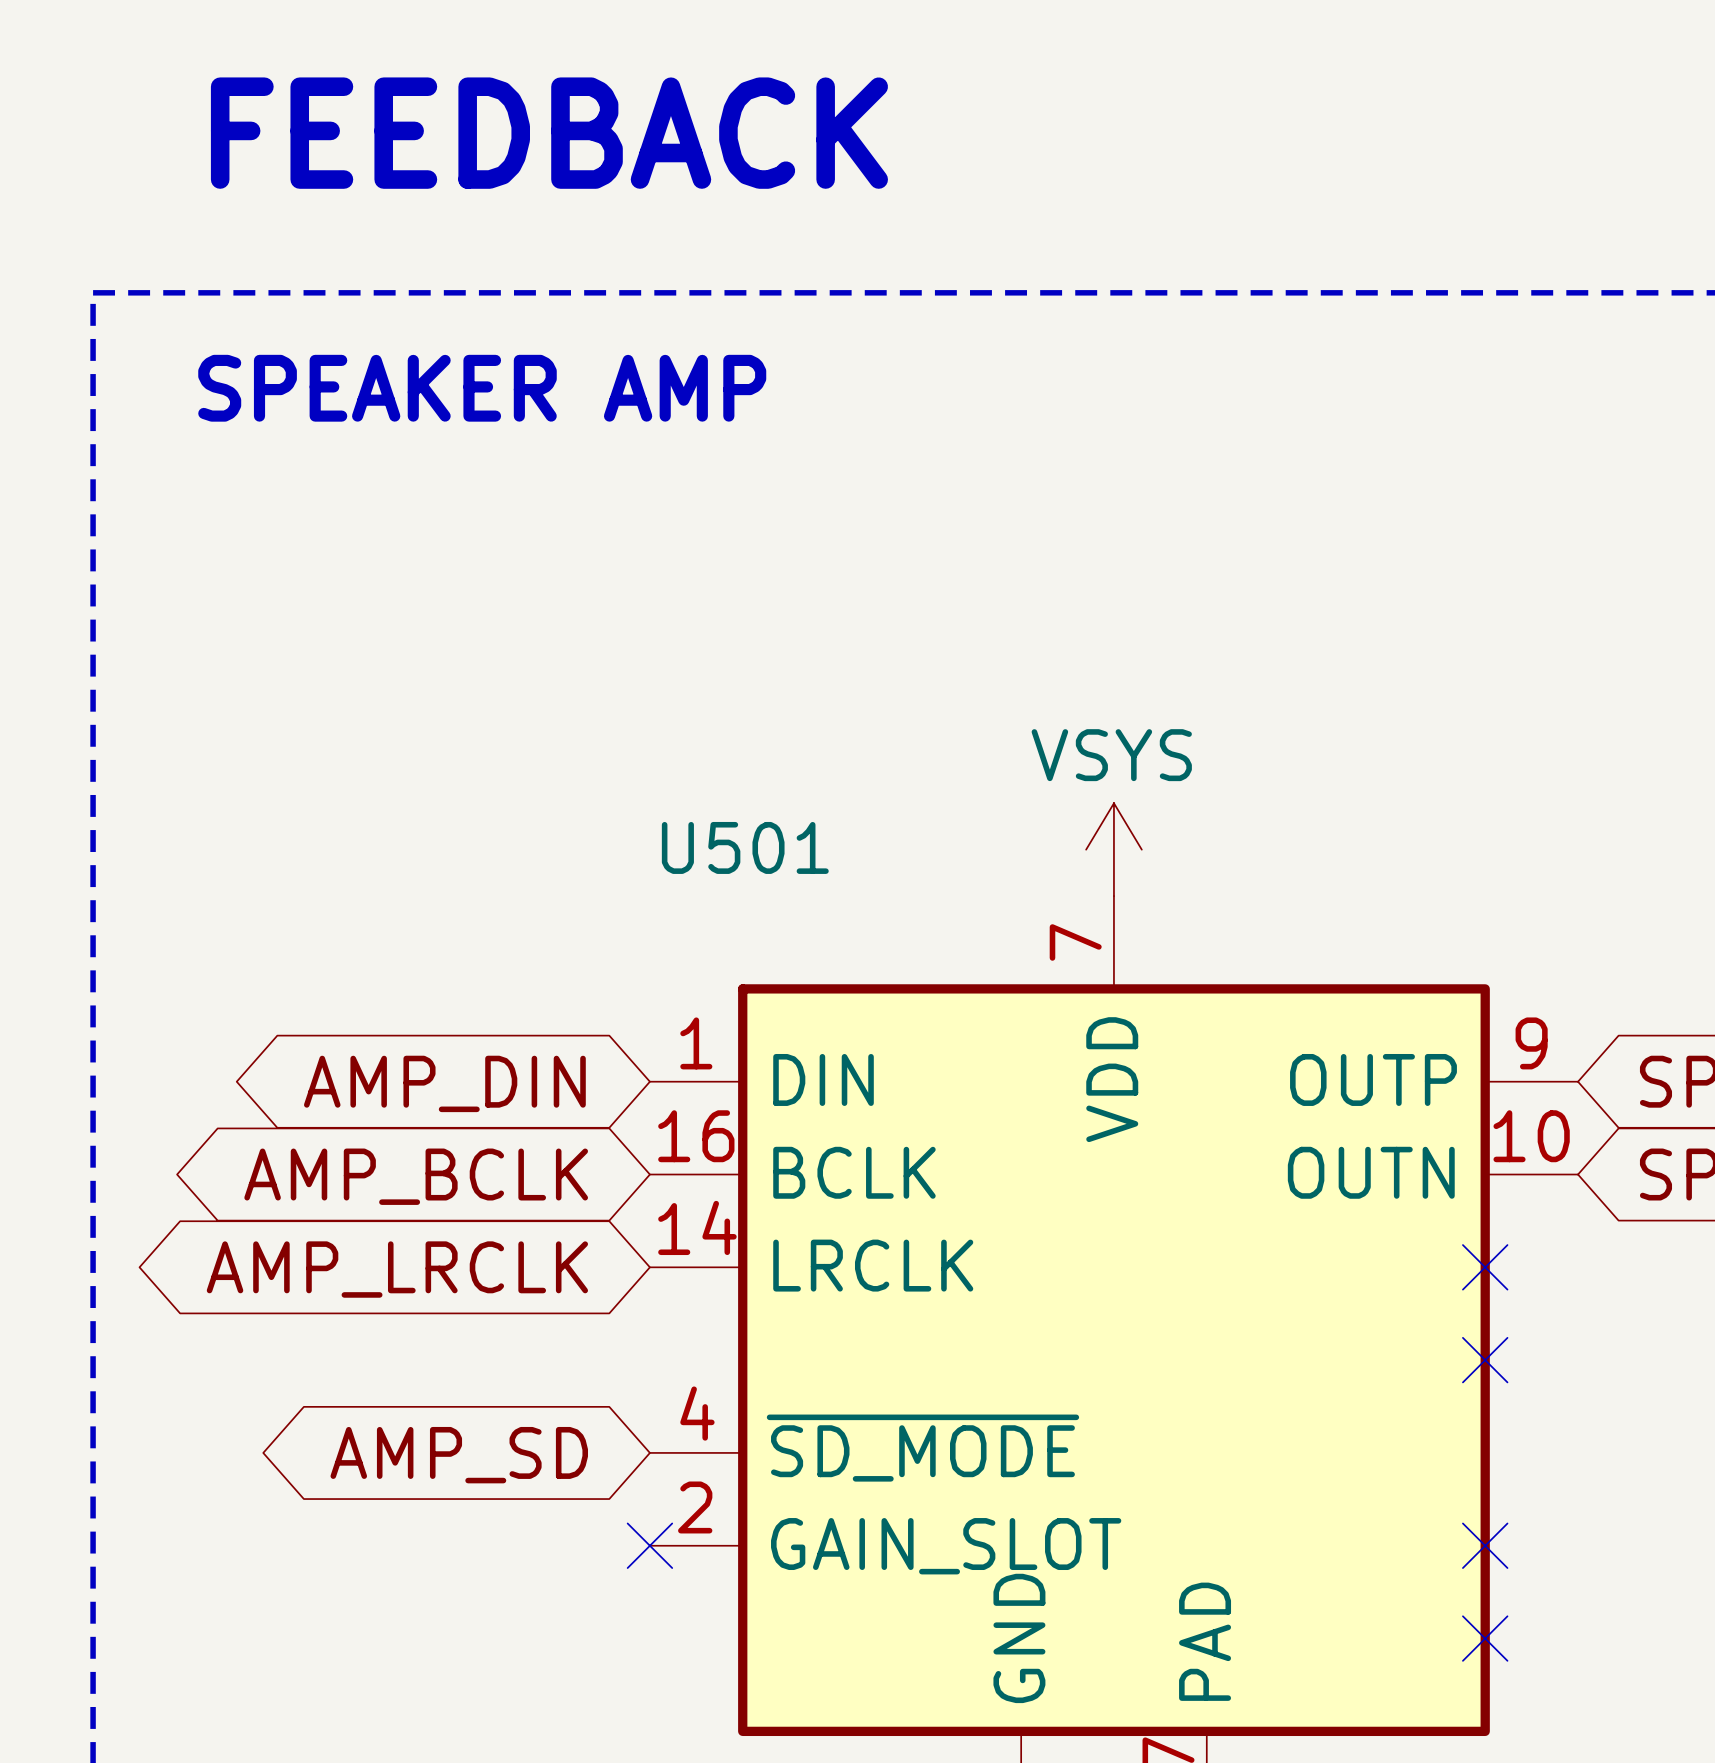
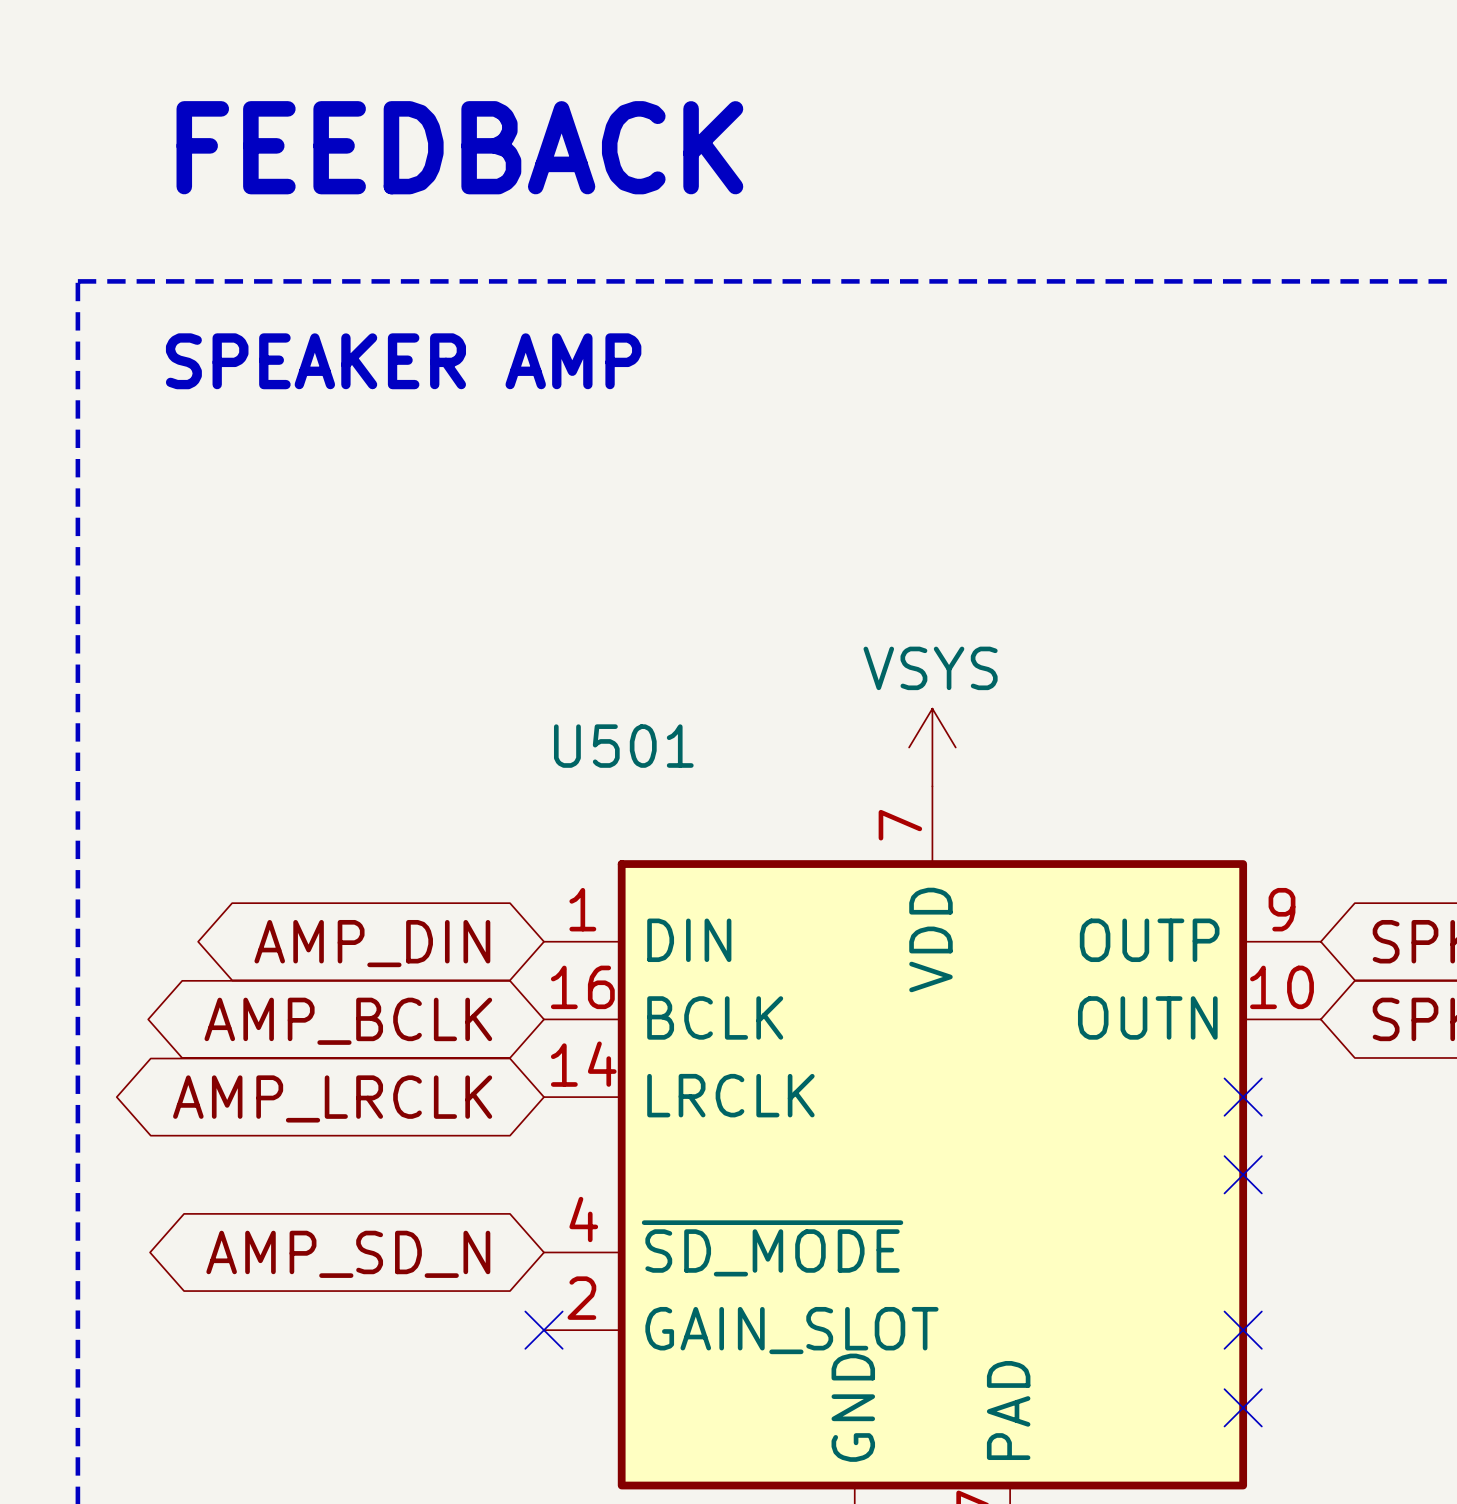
global label: AMP_SD (459, 1455) -> AMP_SD_N (348, 1254)

